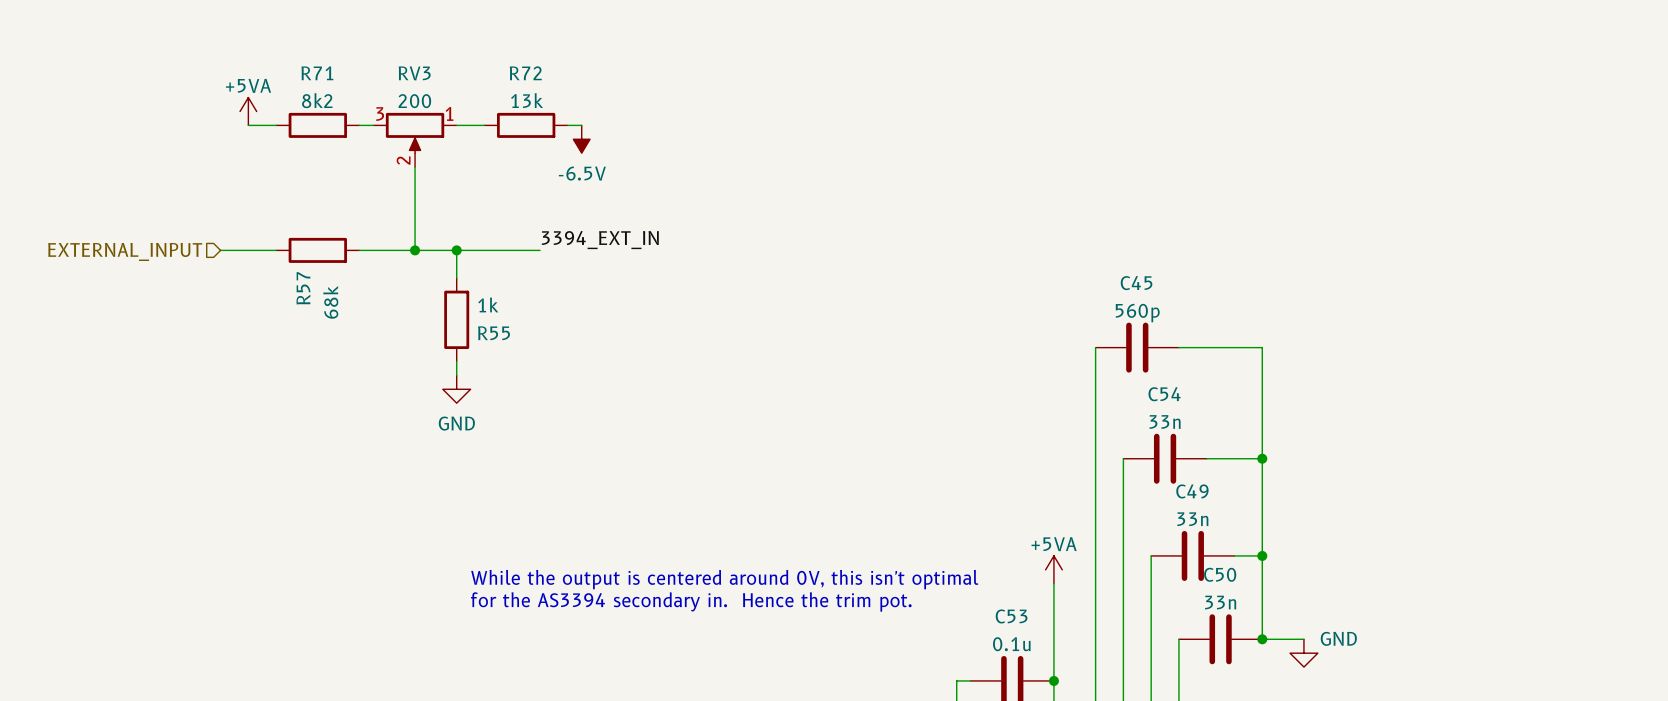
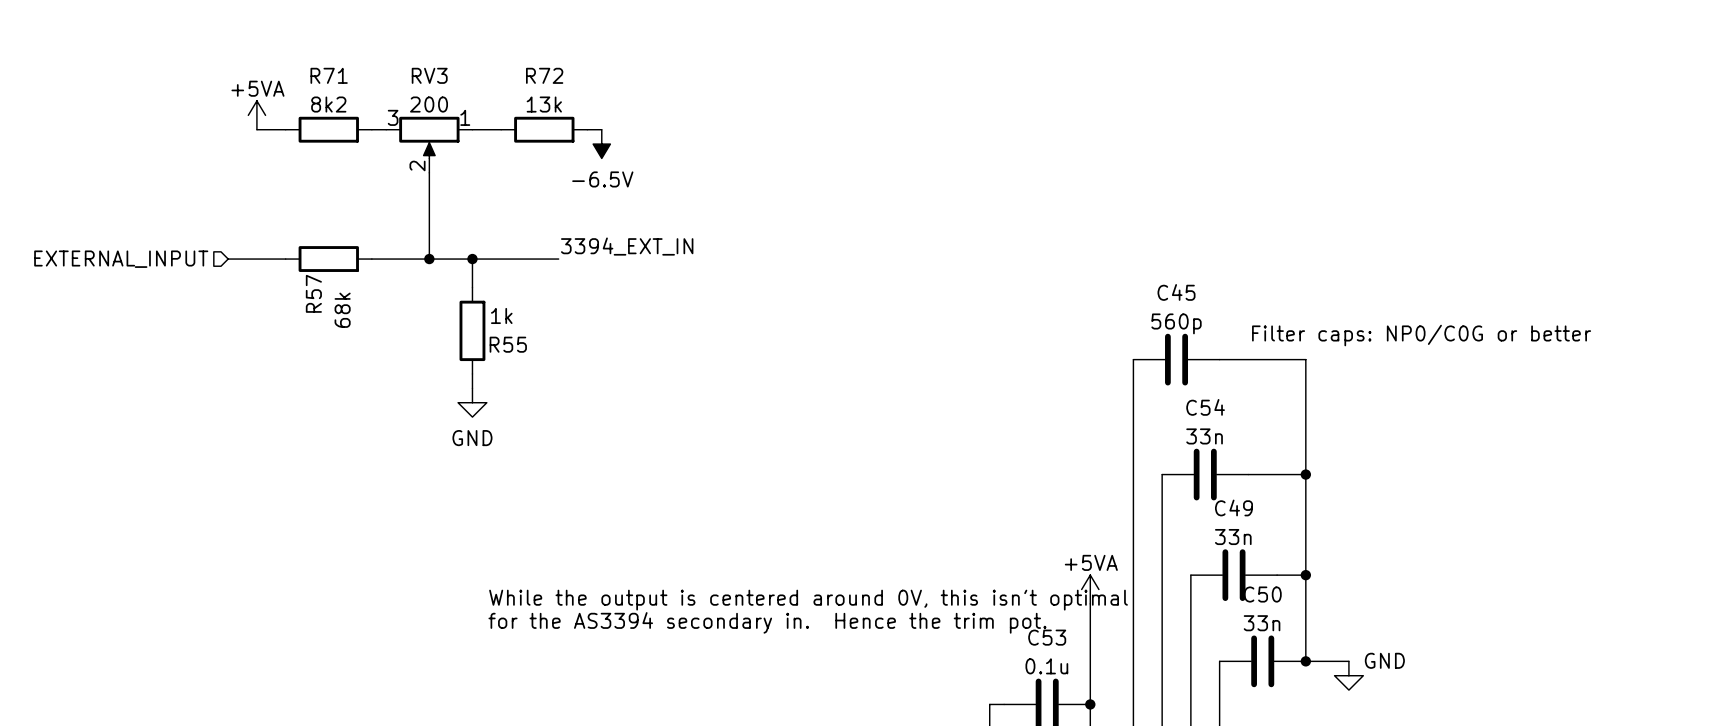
text: none -> Filter caps: NP0/C0G or better (1421, 335)

